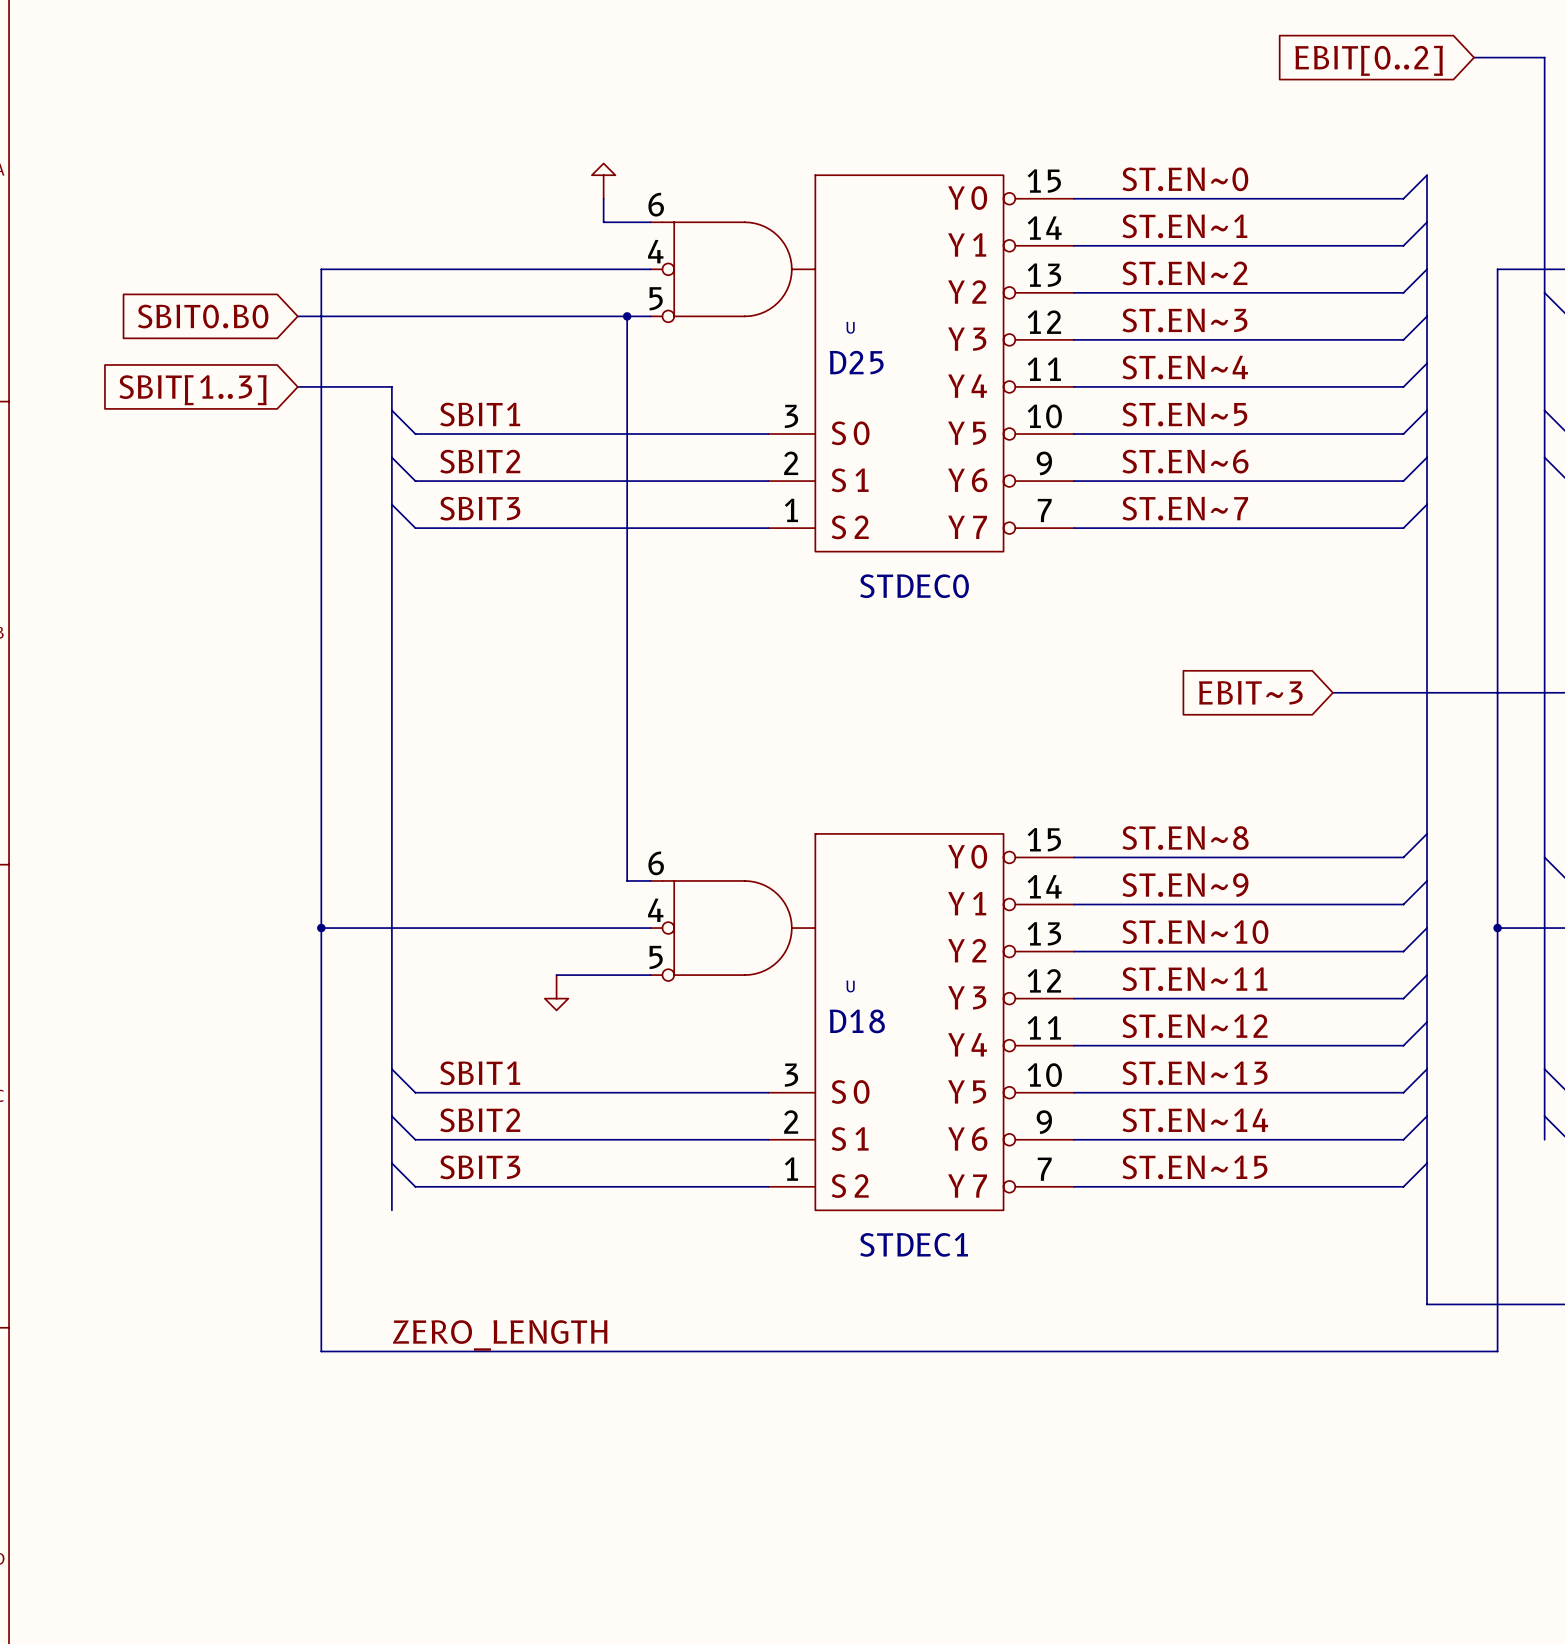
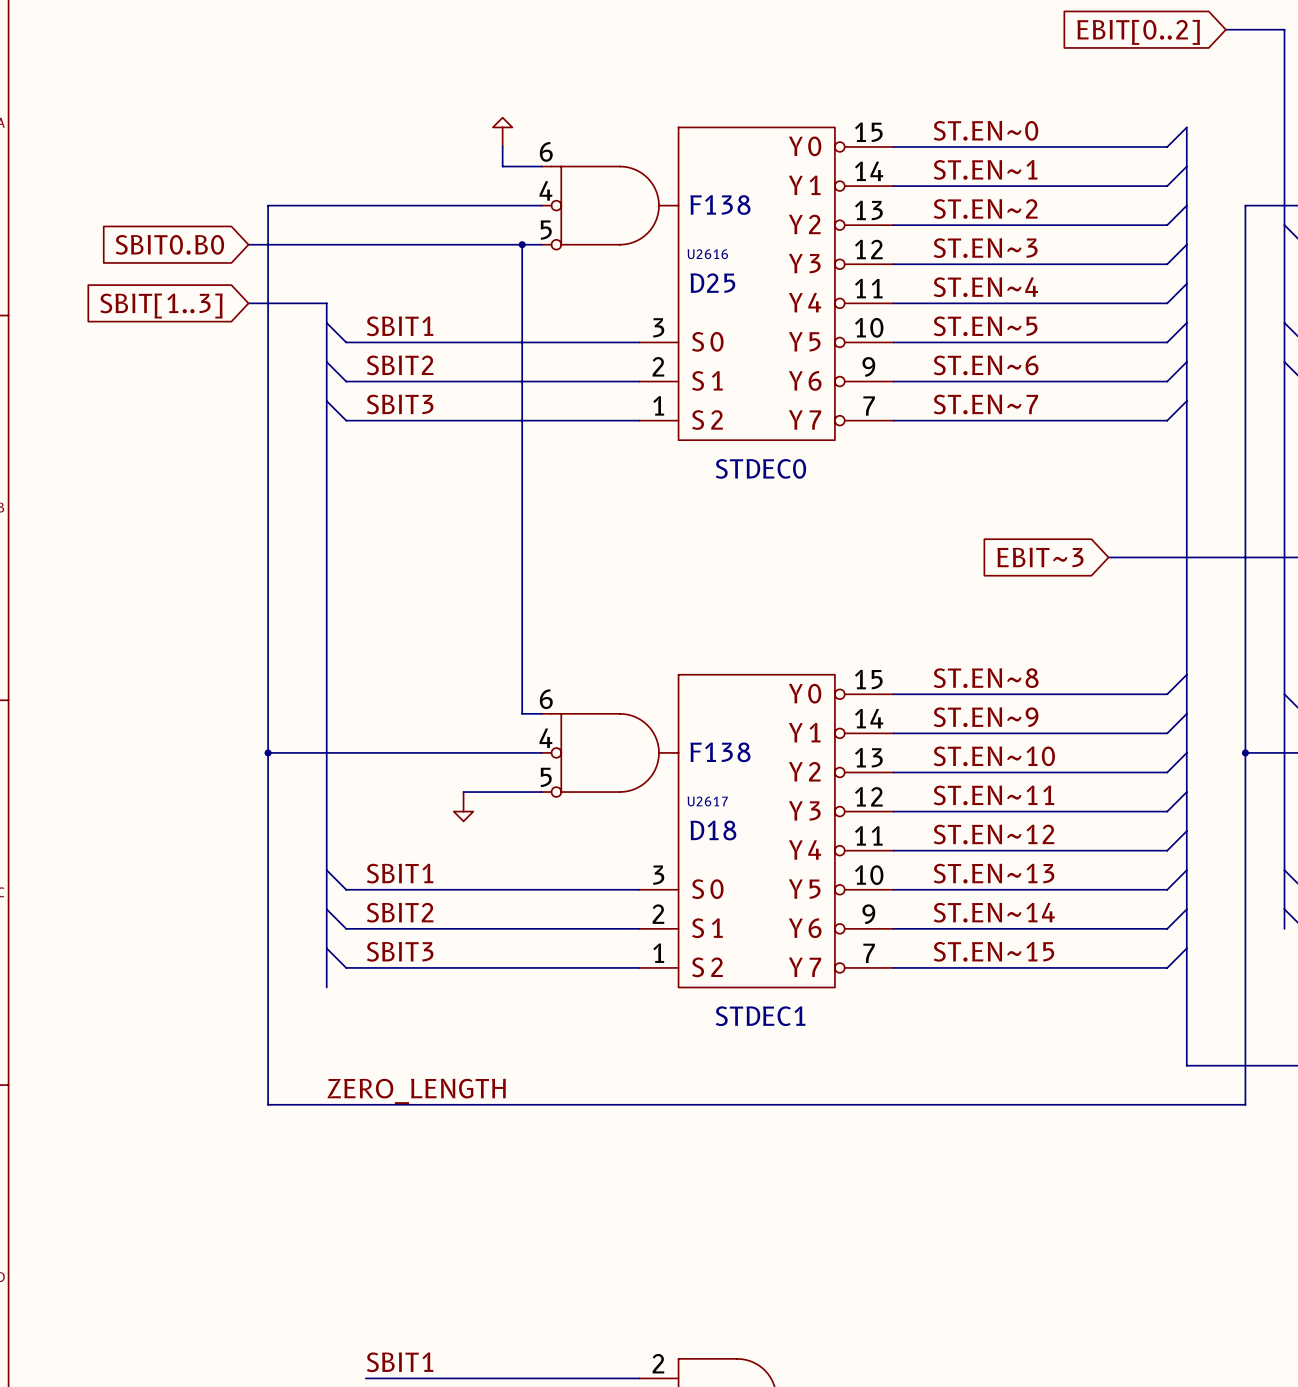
U value: none -> F138 (720, 204)
U name: U (850, 327) -> U2616 (707, 254)
U value: none -> F138 (720, 752)
U name: U (850, 986) -> U2617 (707, 801)

